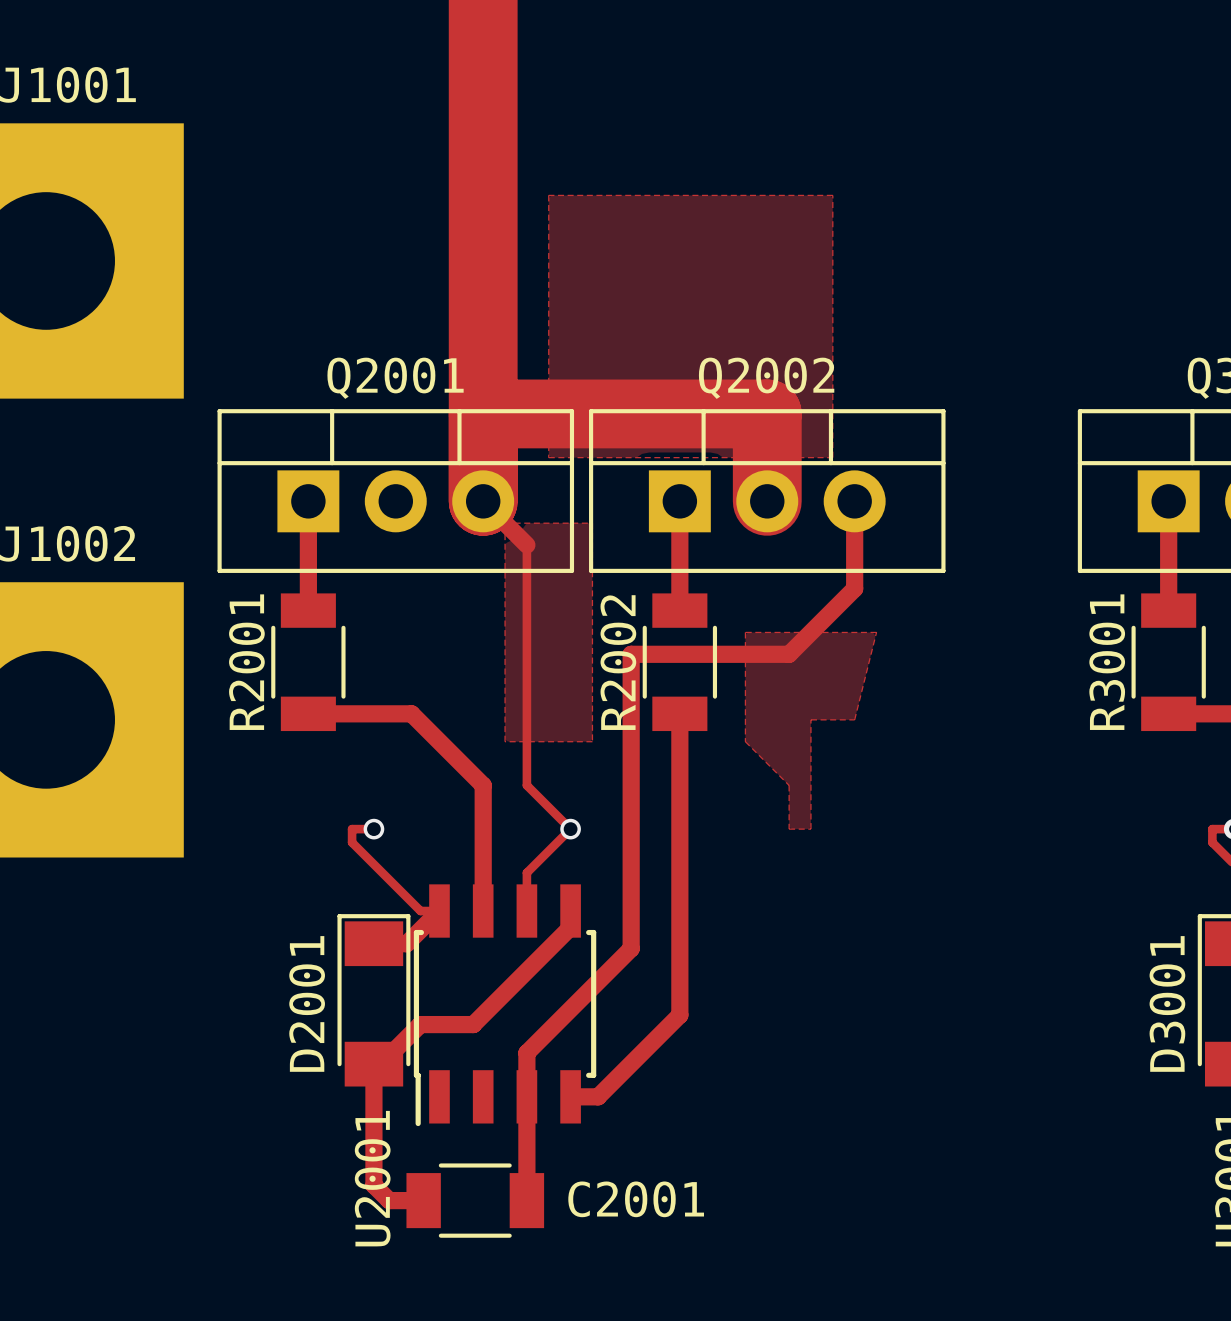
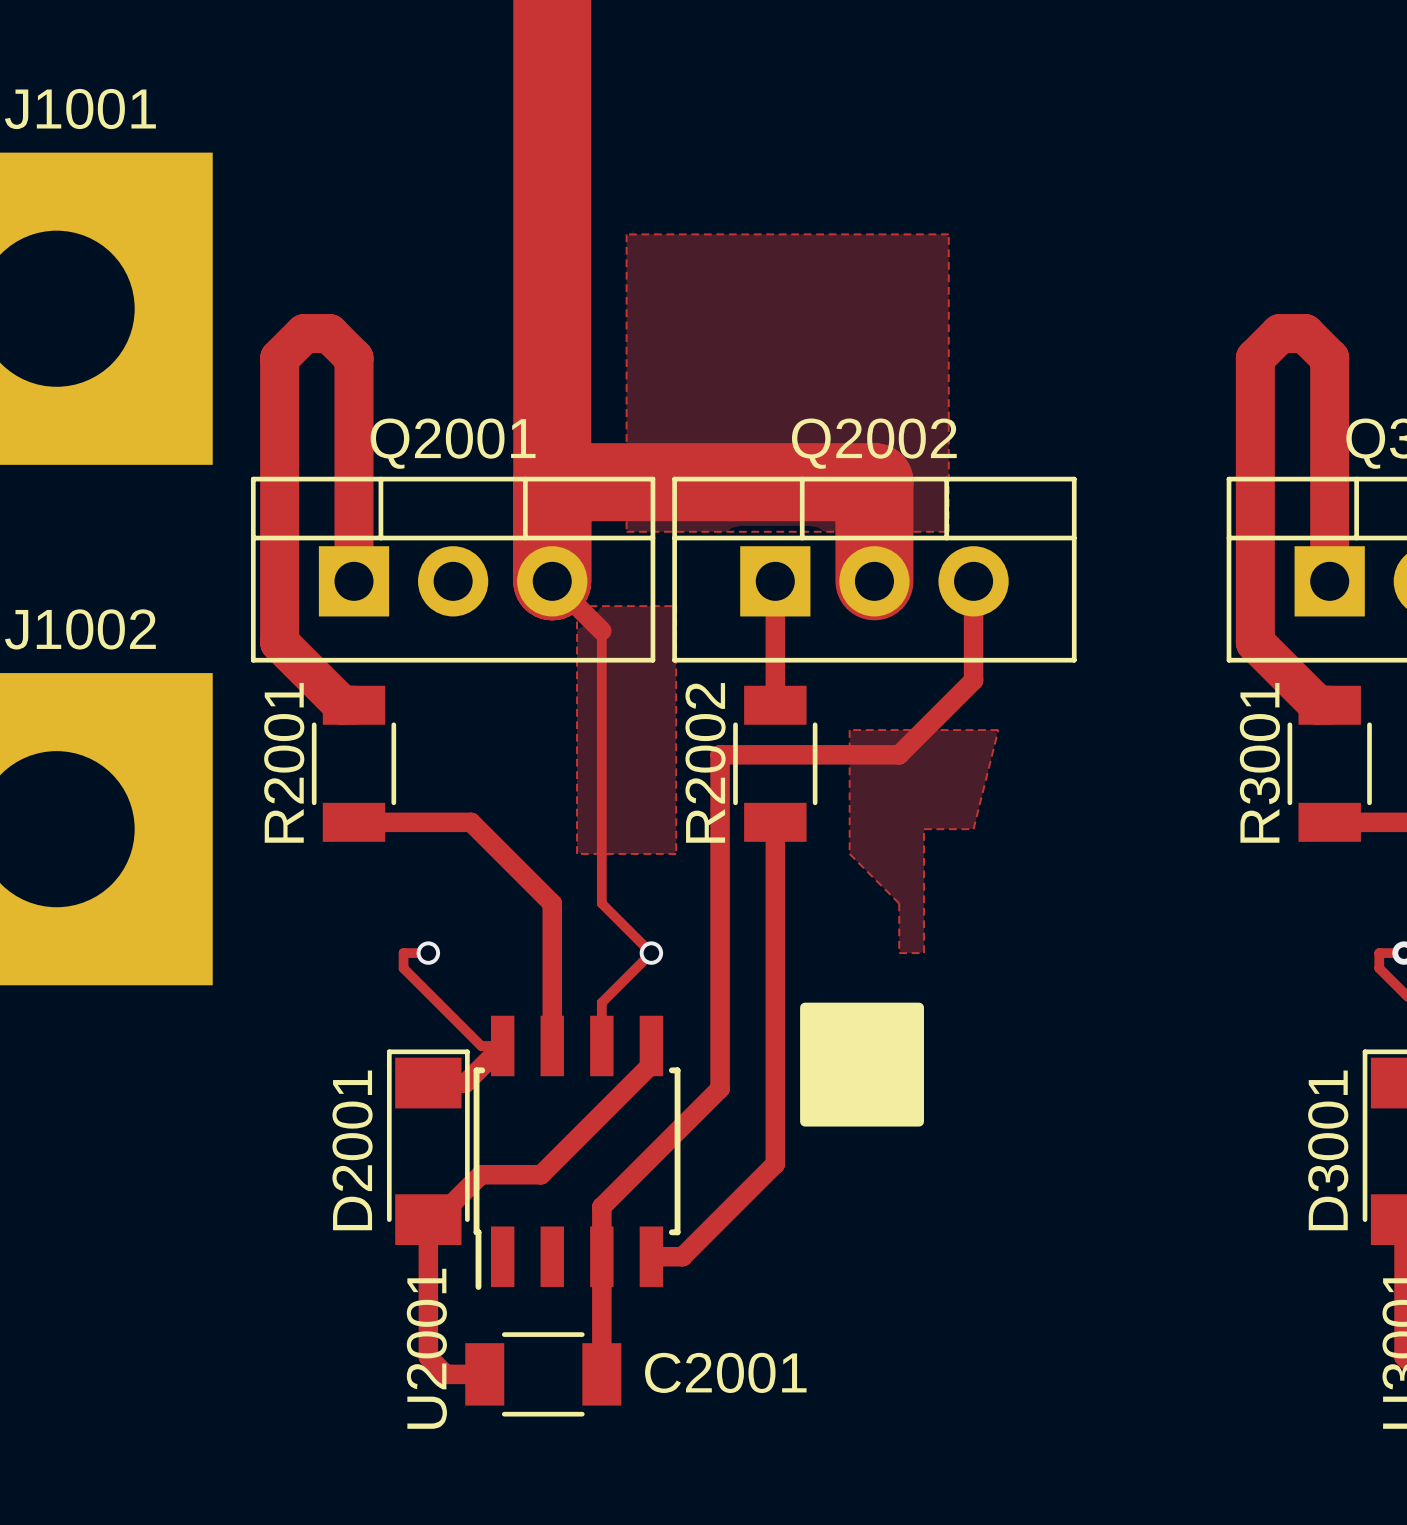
track: (308, 501) (308, 610) -> (354, 581) (354, 358) (329, 333) (304, 333) (279, 358) (279, 642) (342, 705) (354, 705)
track: (1168, 501) (1168, 610) -> (1329, 581) (1329, 358) (1304, 333) (1280, 333) (1255, 358) (1255, 642) (1317, 705) (1329, 705)
drawing: none -> [800, 1002, 925, 1127]

